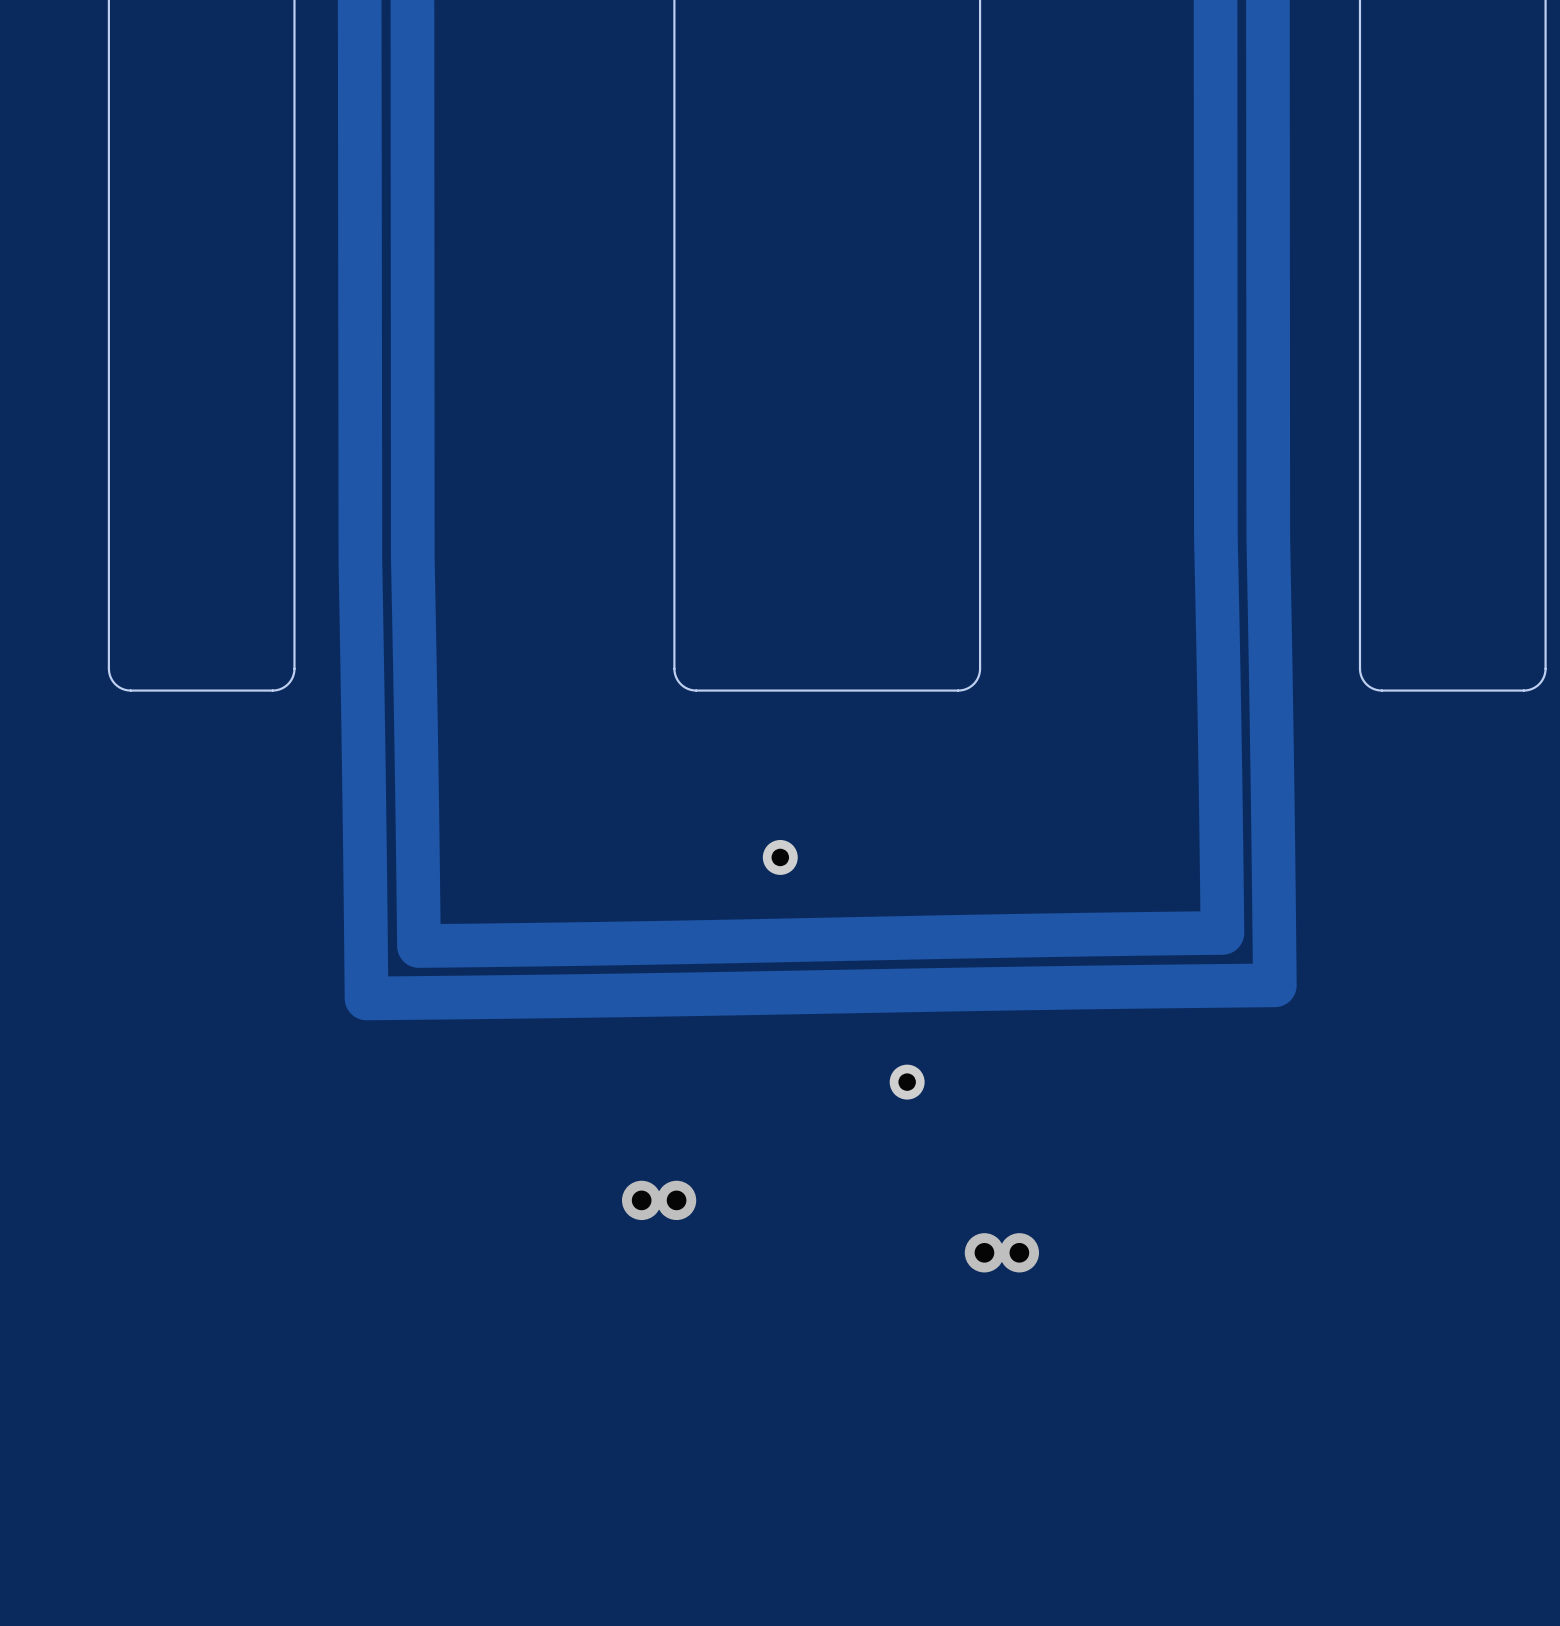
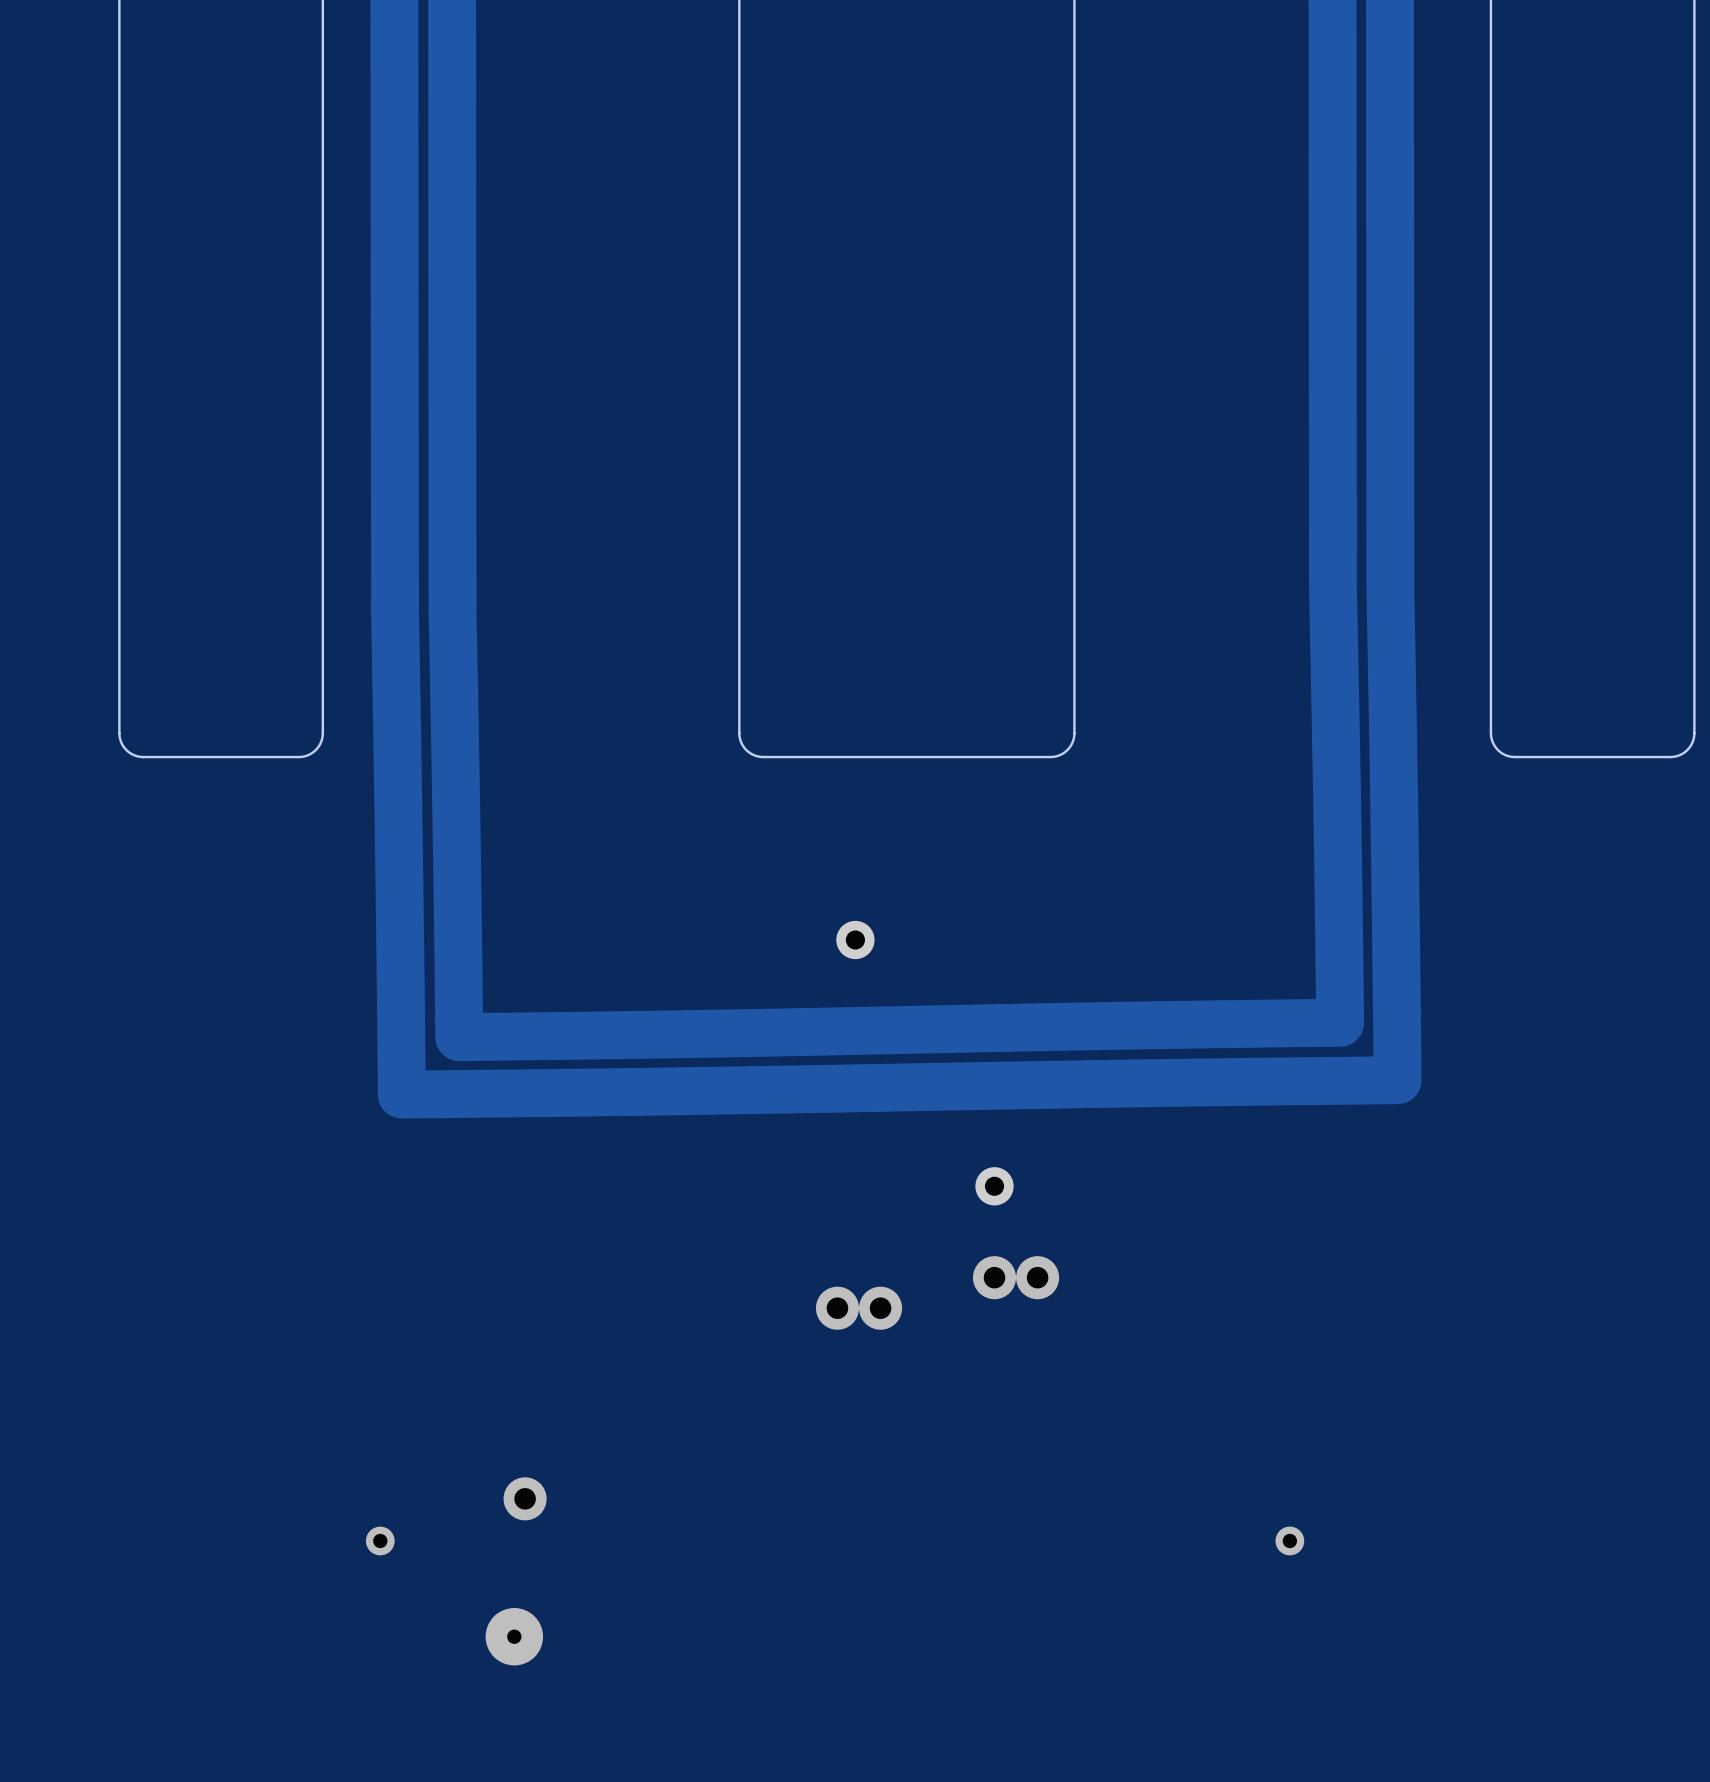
via: none -> (994, 1277)
via: none -> (1037, 1277)
via: none -> (837, 1308)
via: none -> (880, 1308)
via: (641, 1200) -> none
via: (676, 1200) -> none
via: (984, 1252) -> none
via: (1019, 1252) -> none
via: none -> (525, 1498)
via: none -> (380, 1540)
via: none -> (1289, 1540)
via: none -> (514, 1636)

